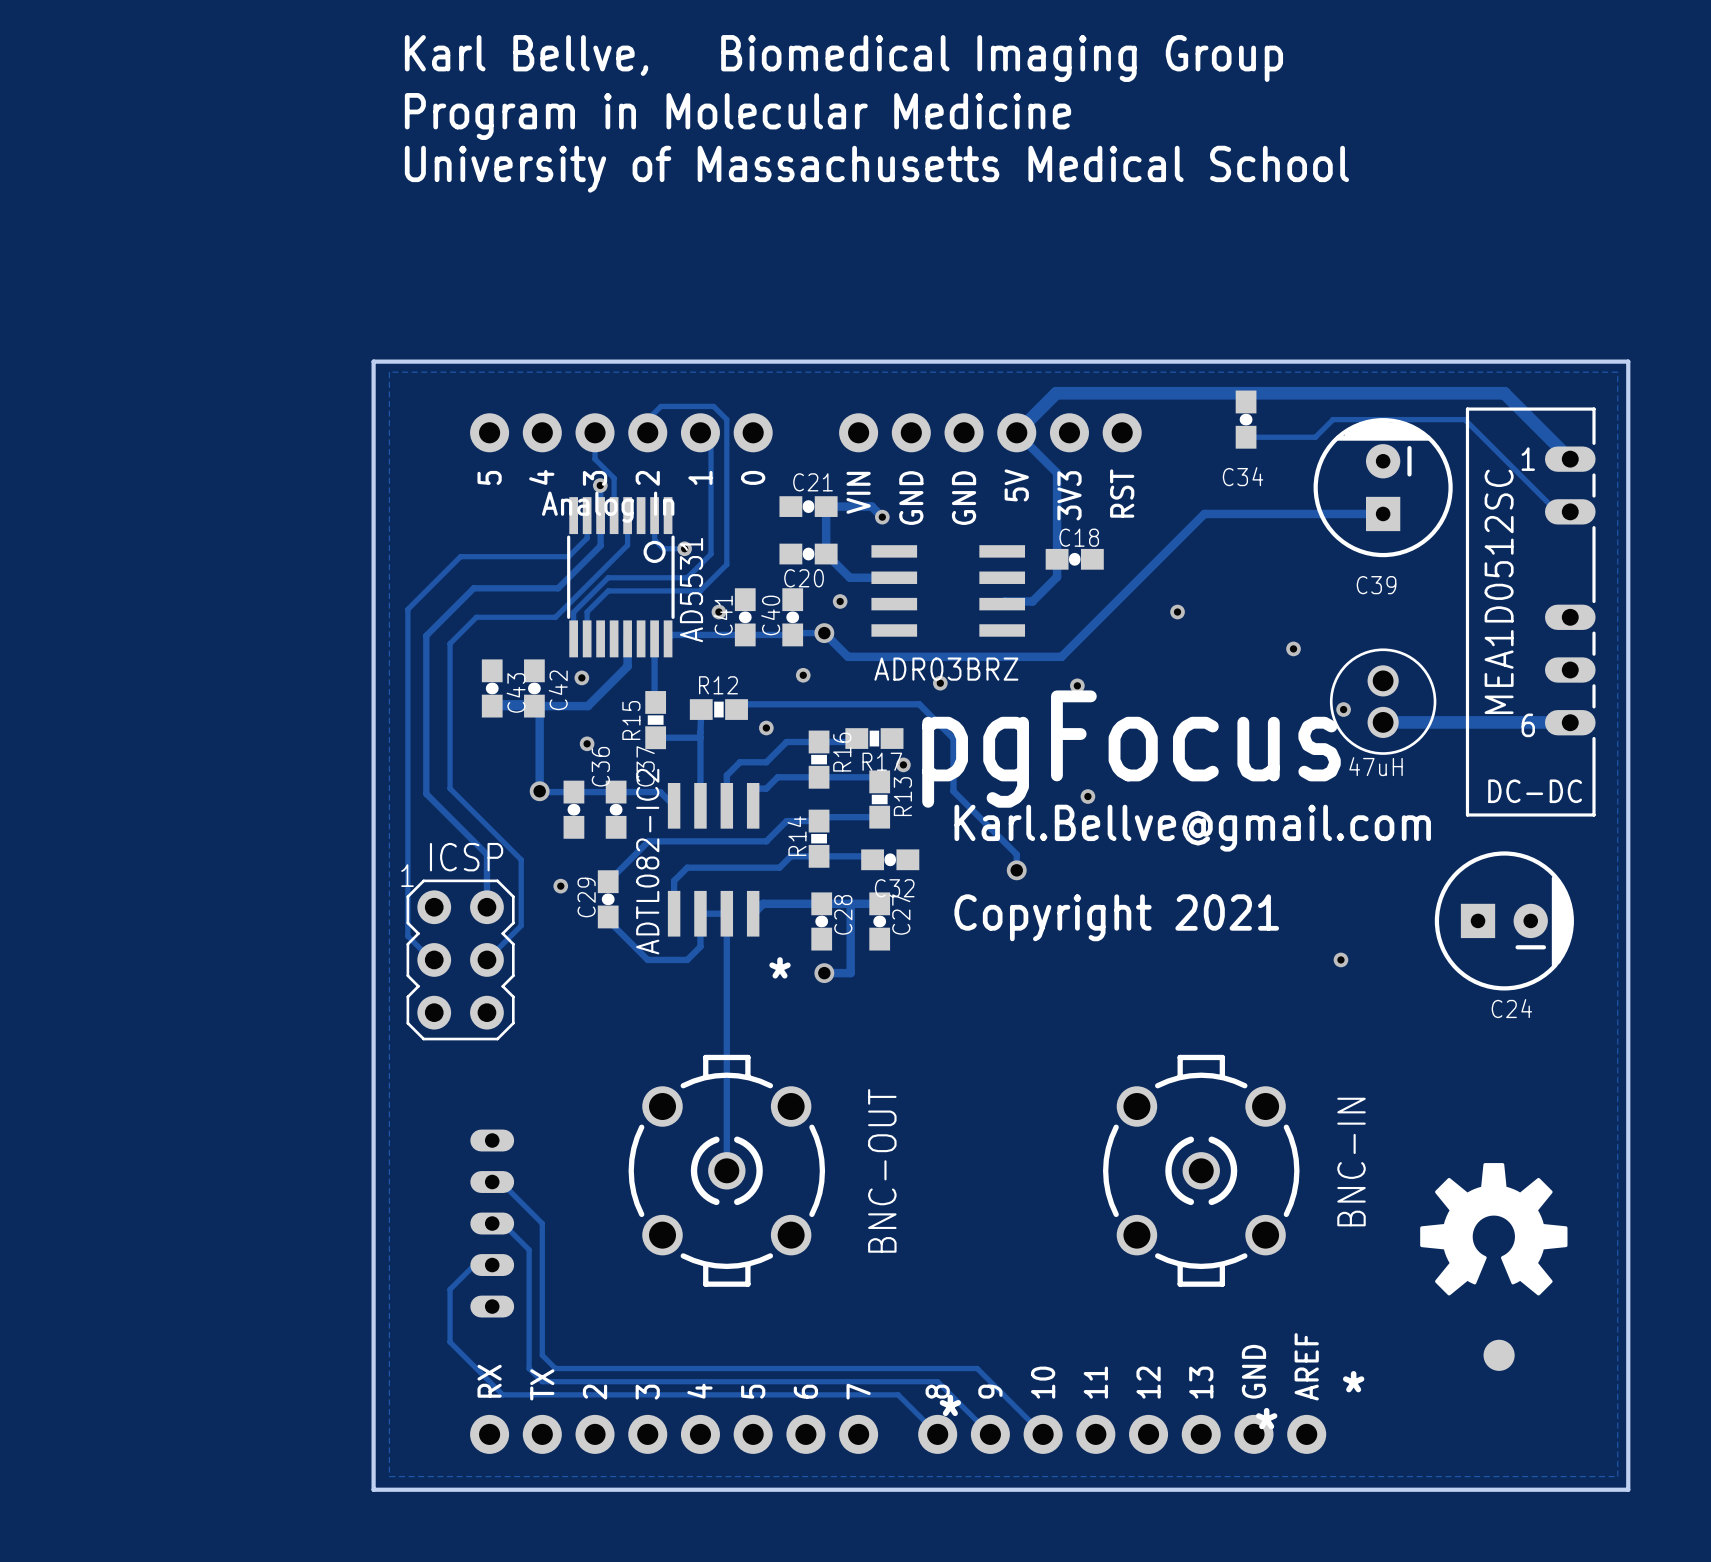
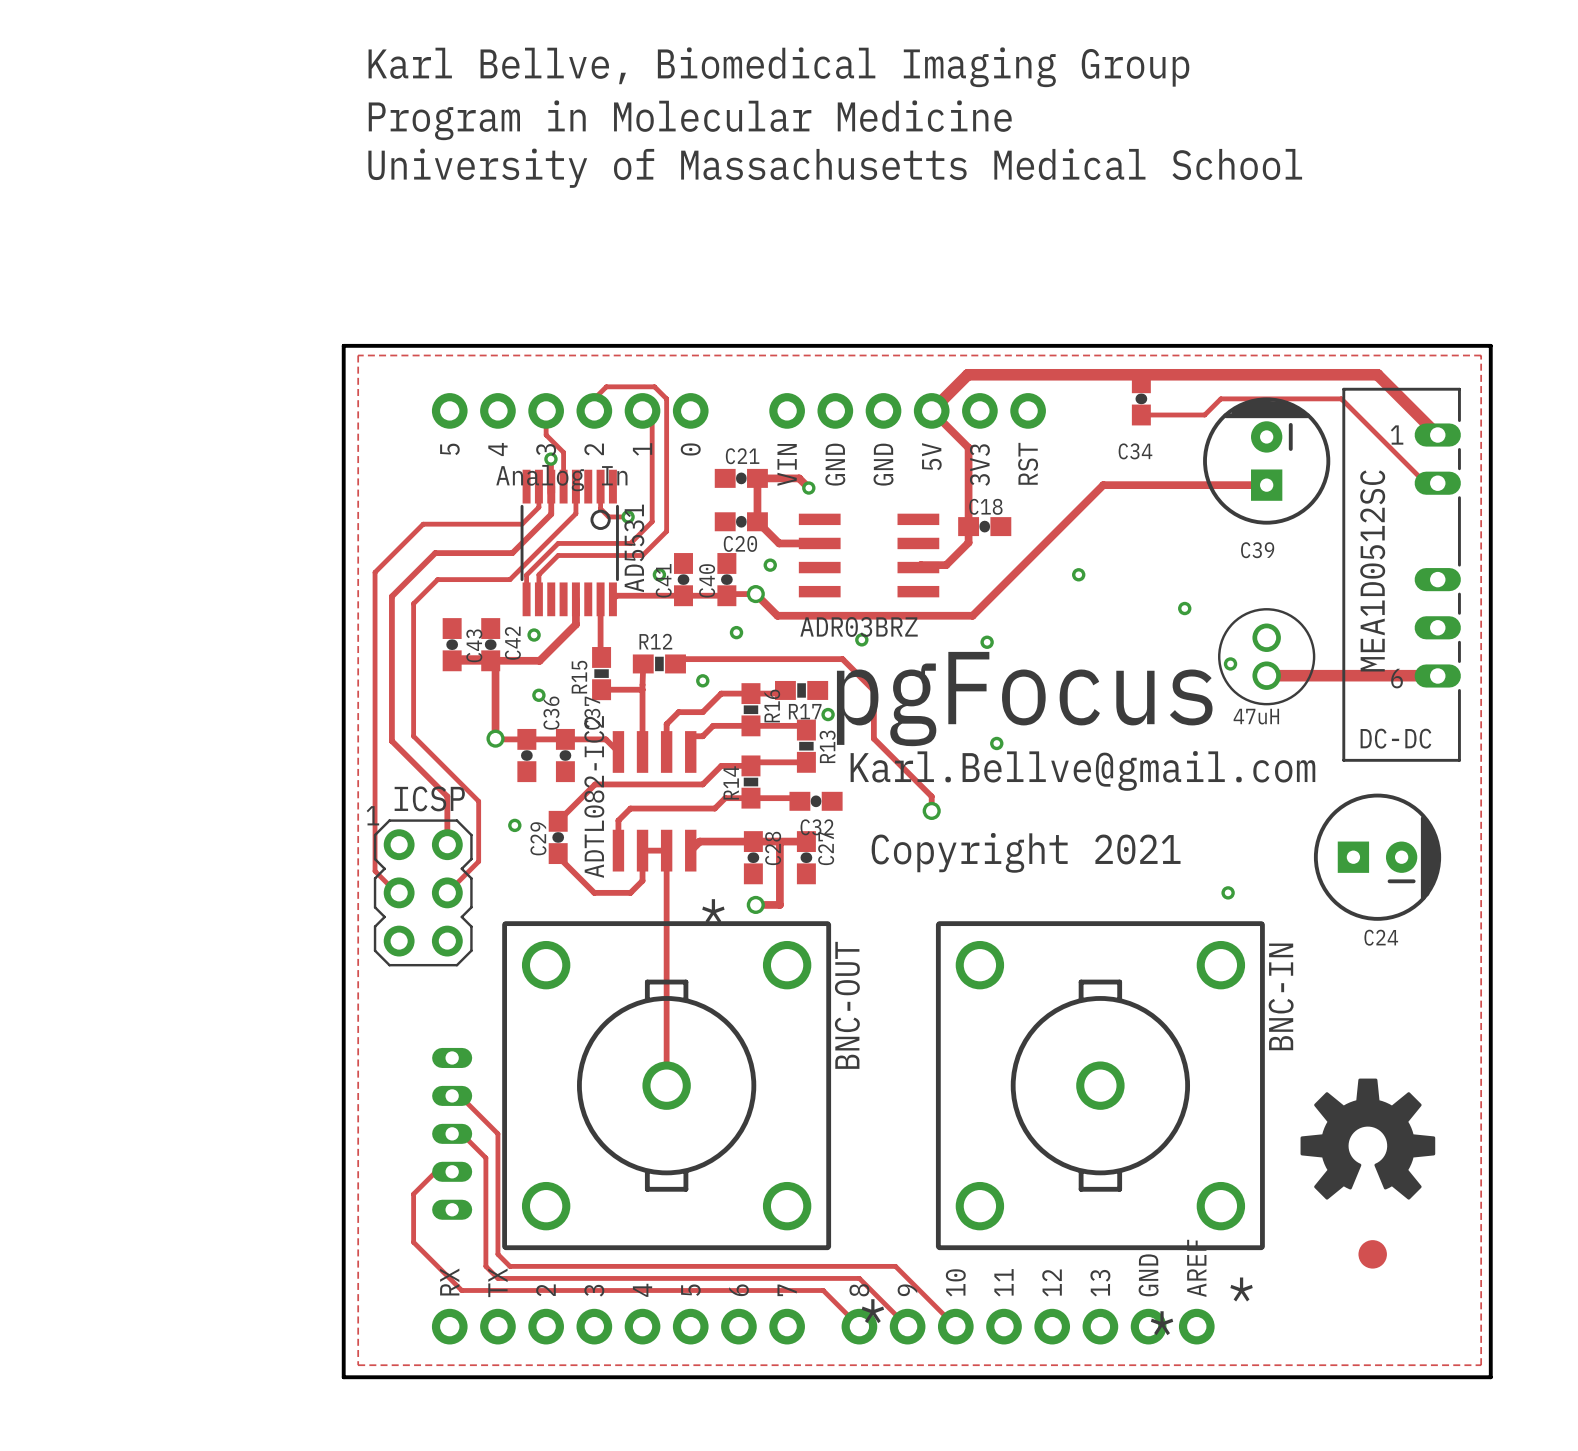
BNC-OUT footprint: [628, 1054, 826, 1287] -> [502, 921, 832, 1251]
BNC-IN footprint: [1103, 1054, 1300, 1287] -> [935, 921, 1265, 1251]
BNC-IN name position: BNC-IN (1351, 1162) -> BNC-IN (1281, 996)
BNC-OUT name position: BNC-OUT (882, 1170) -> BNC-OUT (847, 1005)

